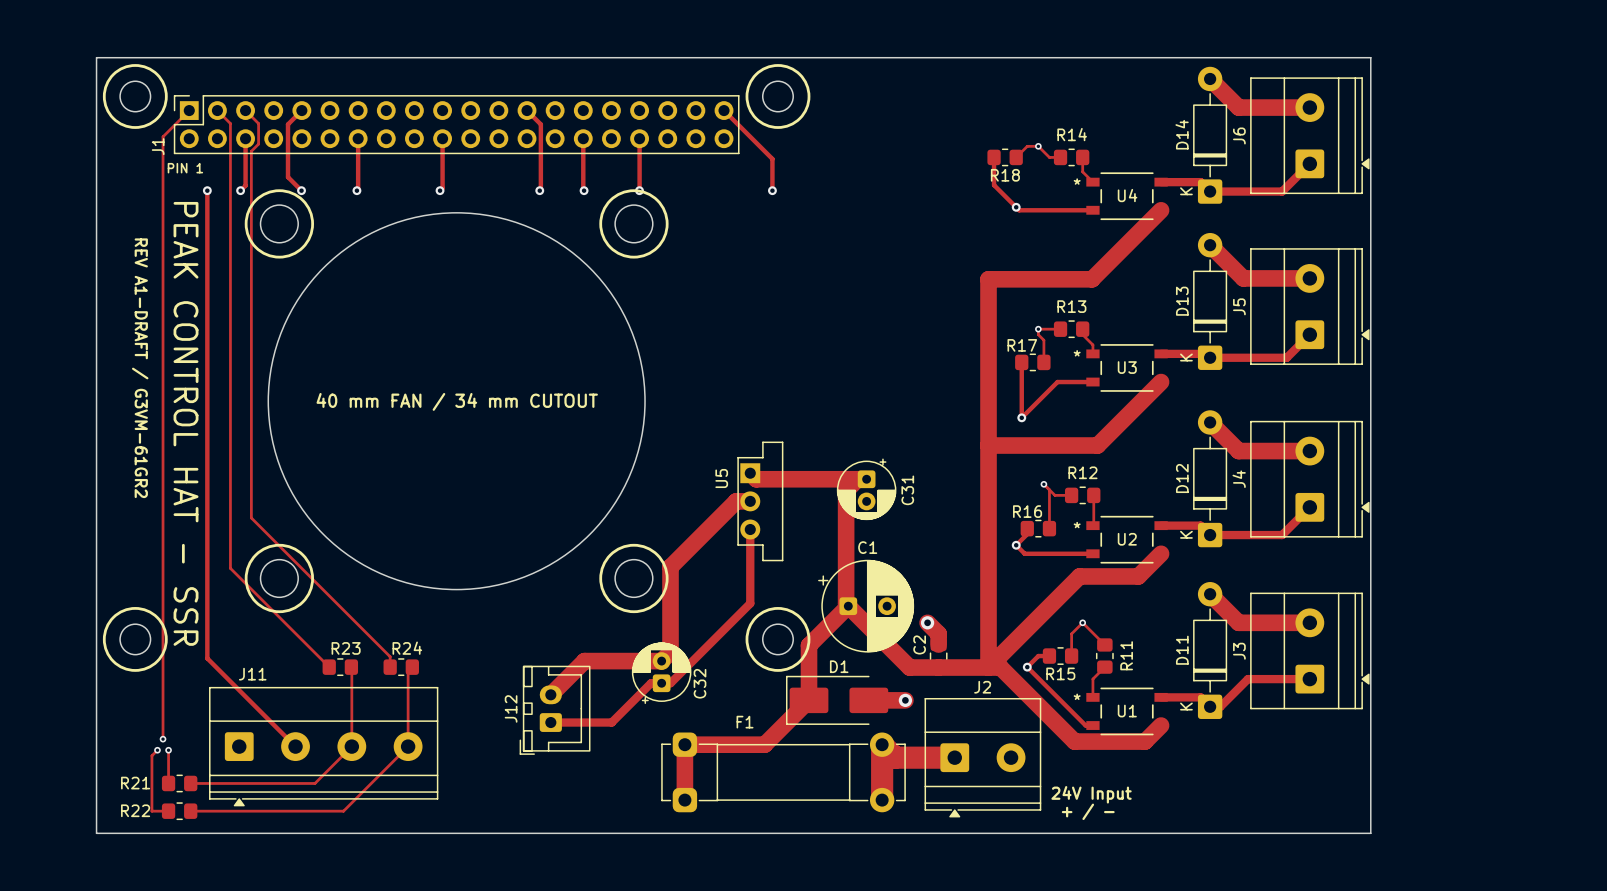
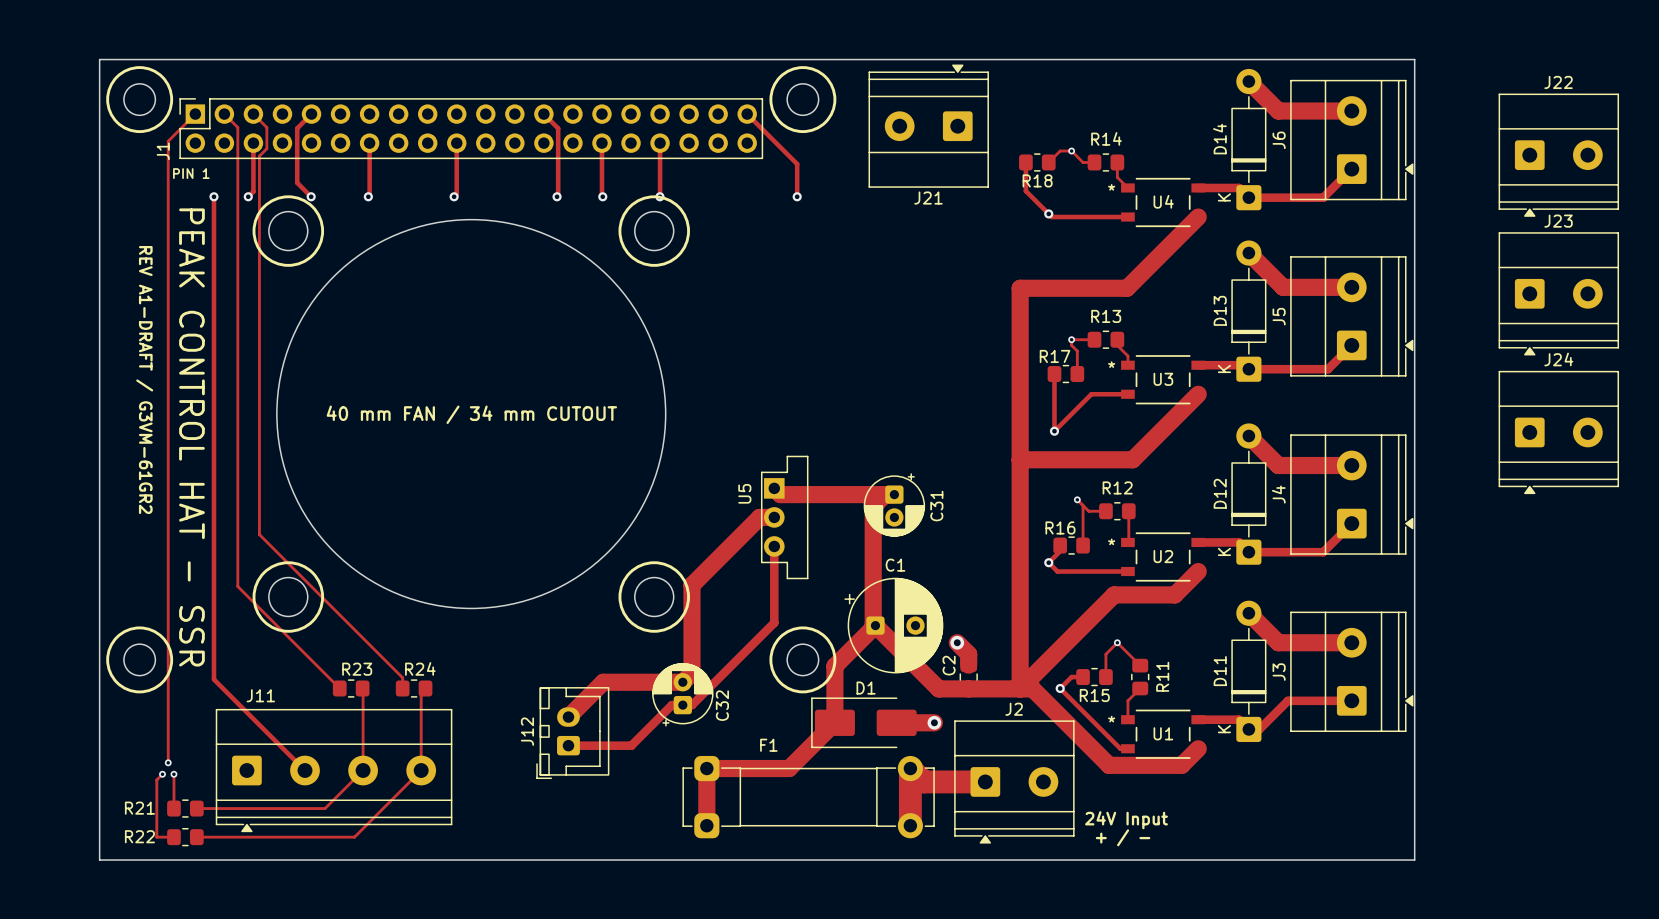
J21: none -> (928, 126)
J22: none -> (1558, 155)
J23: none -> (1558, 293)
J24: none -> (1558, 432)

